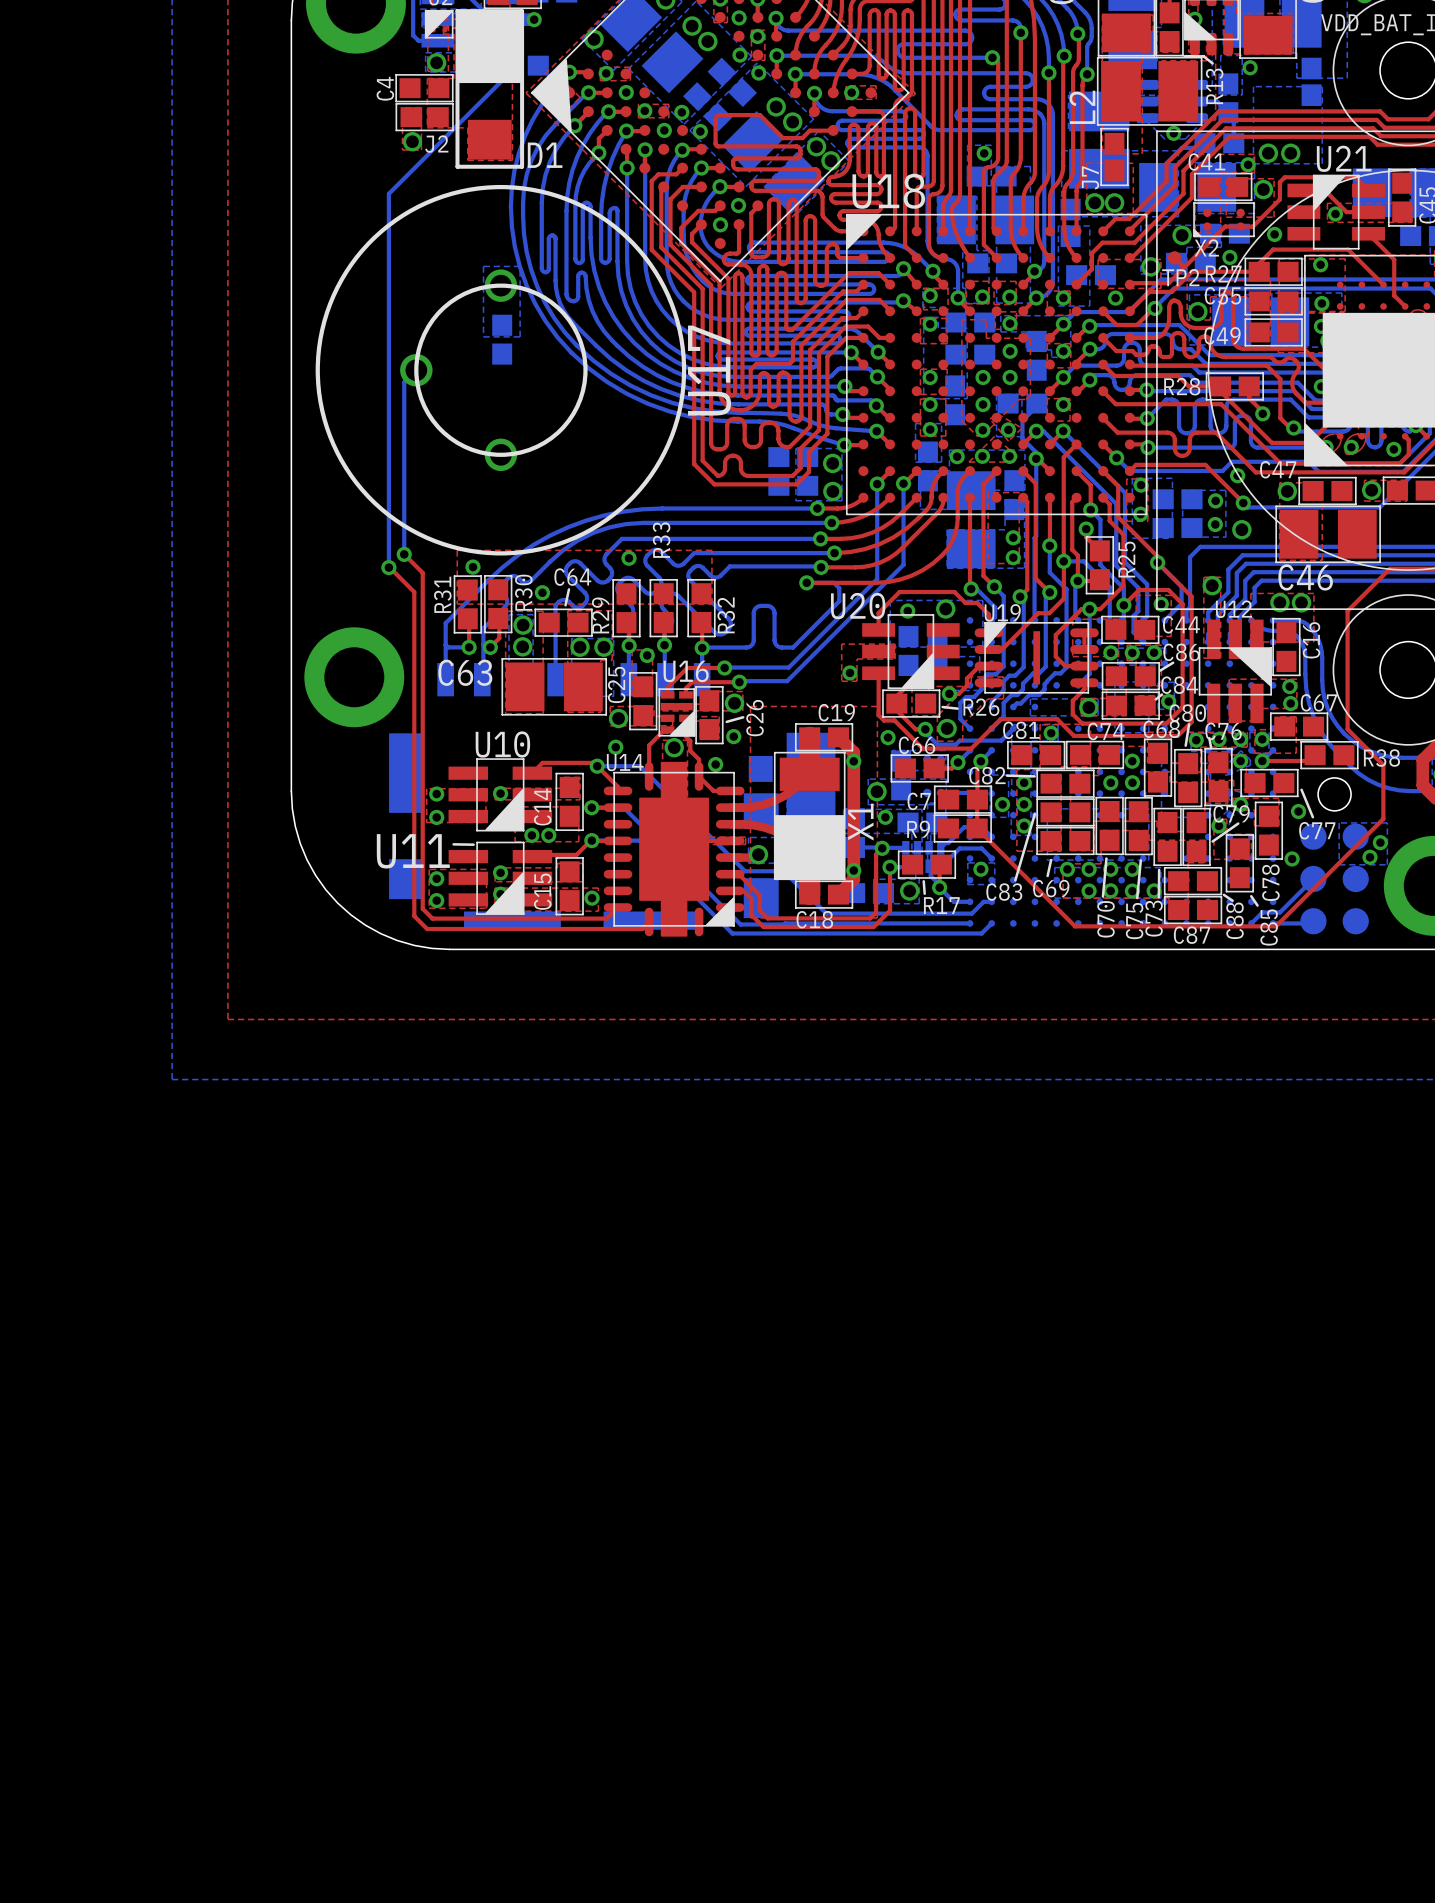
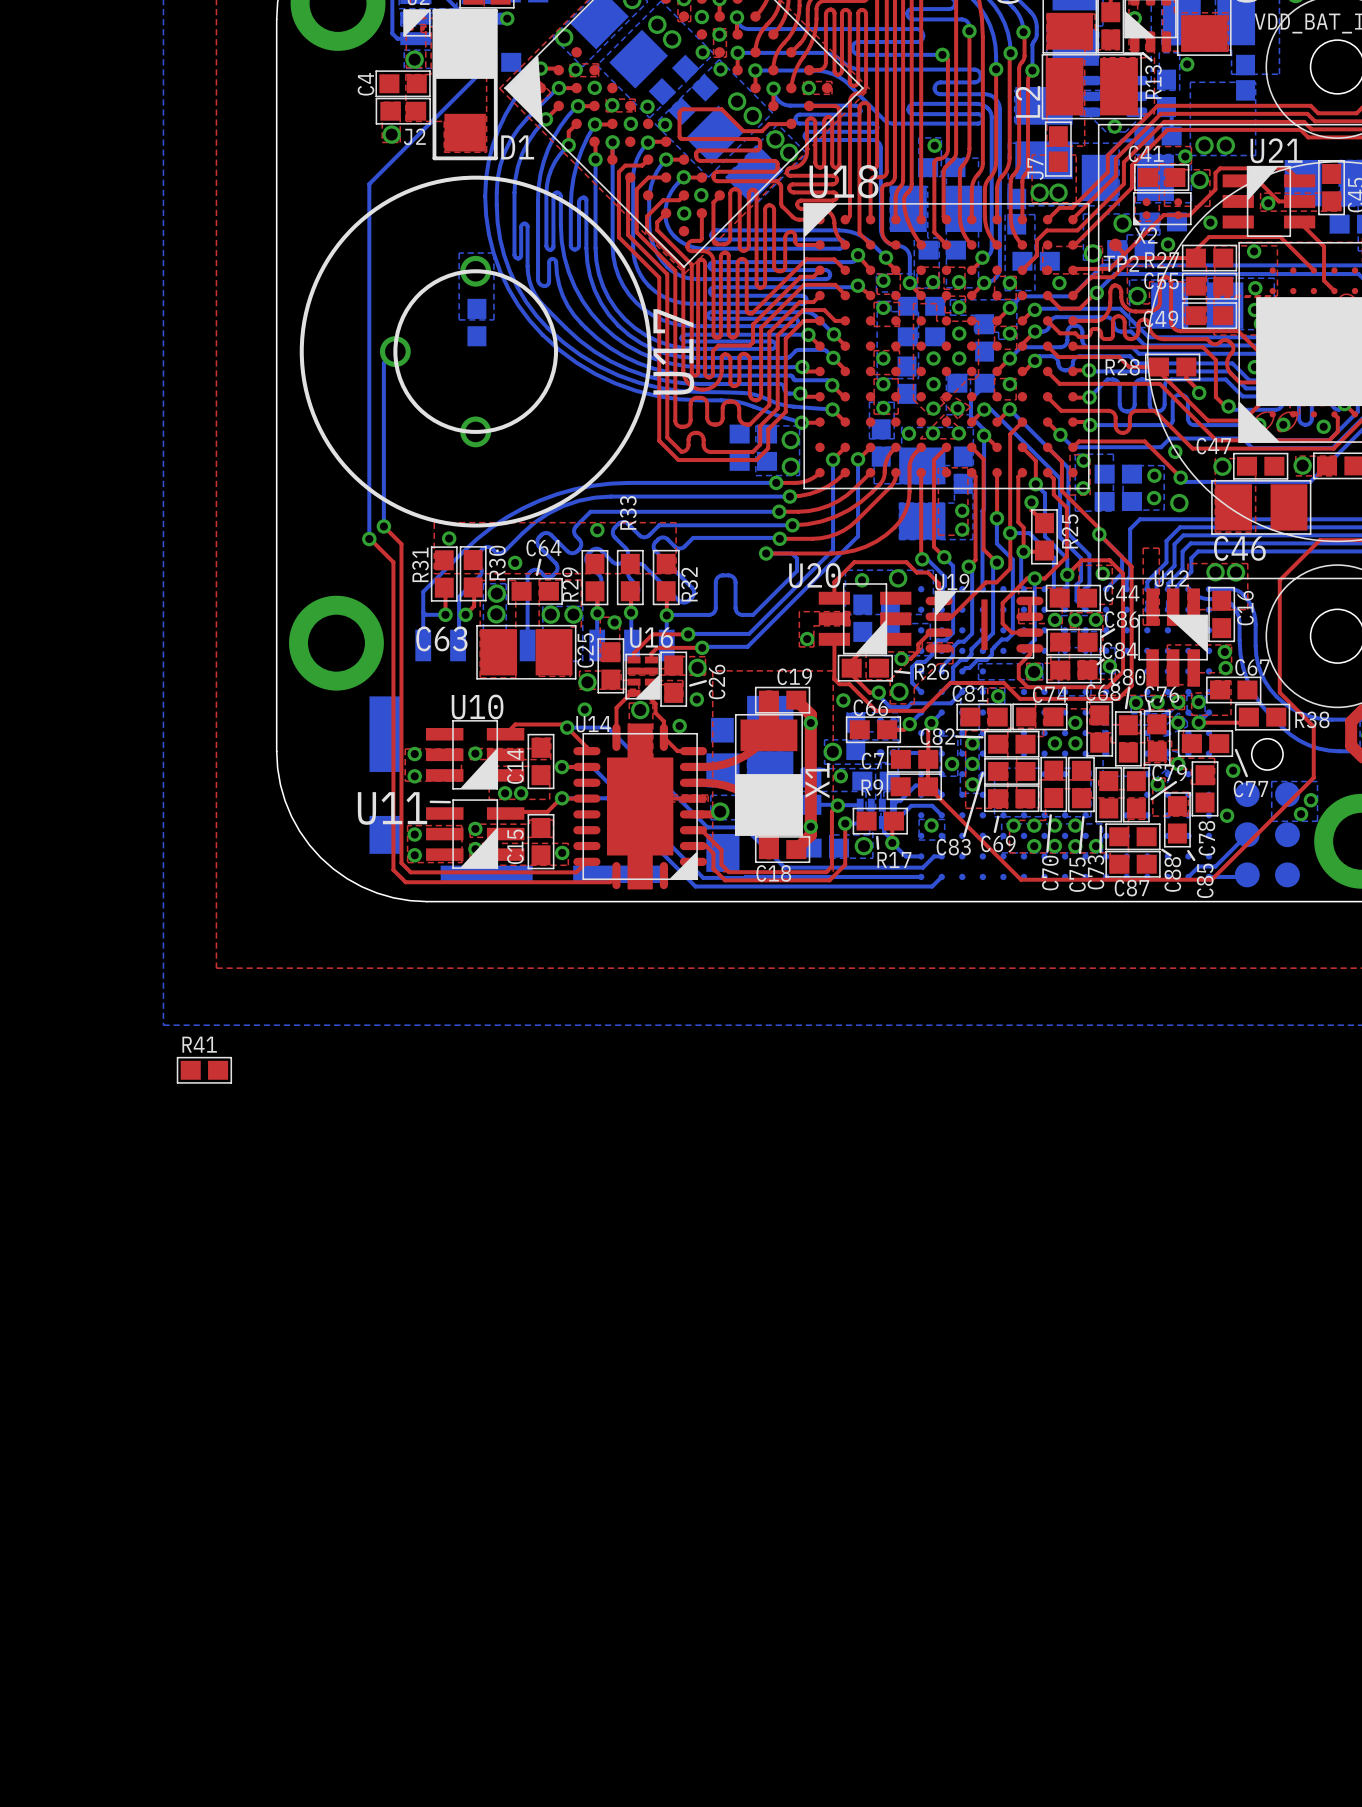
via: (1212, 585) -> none
R41: none -> (204, 1070)

